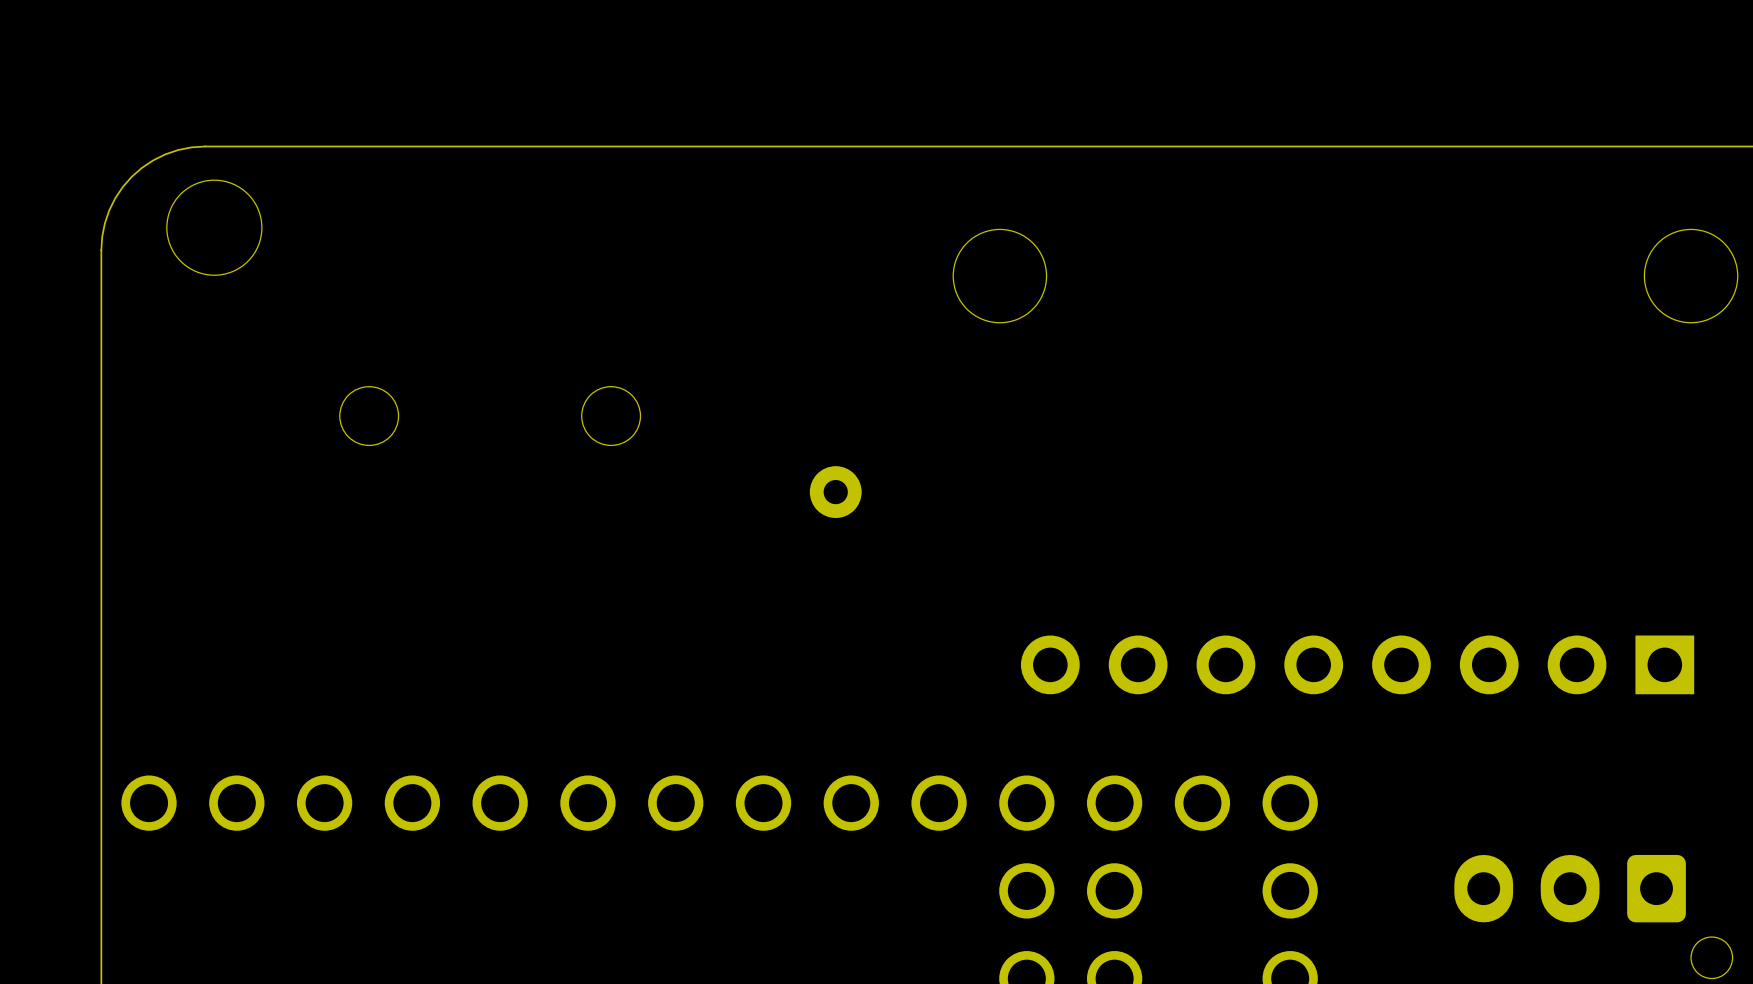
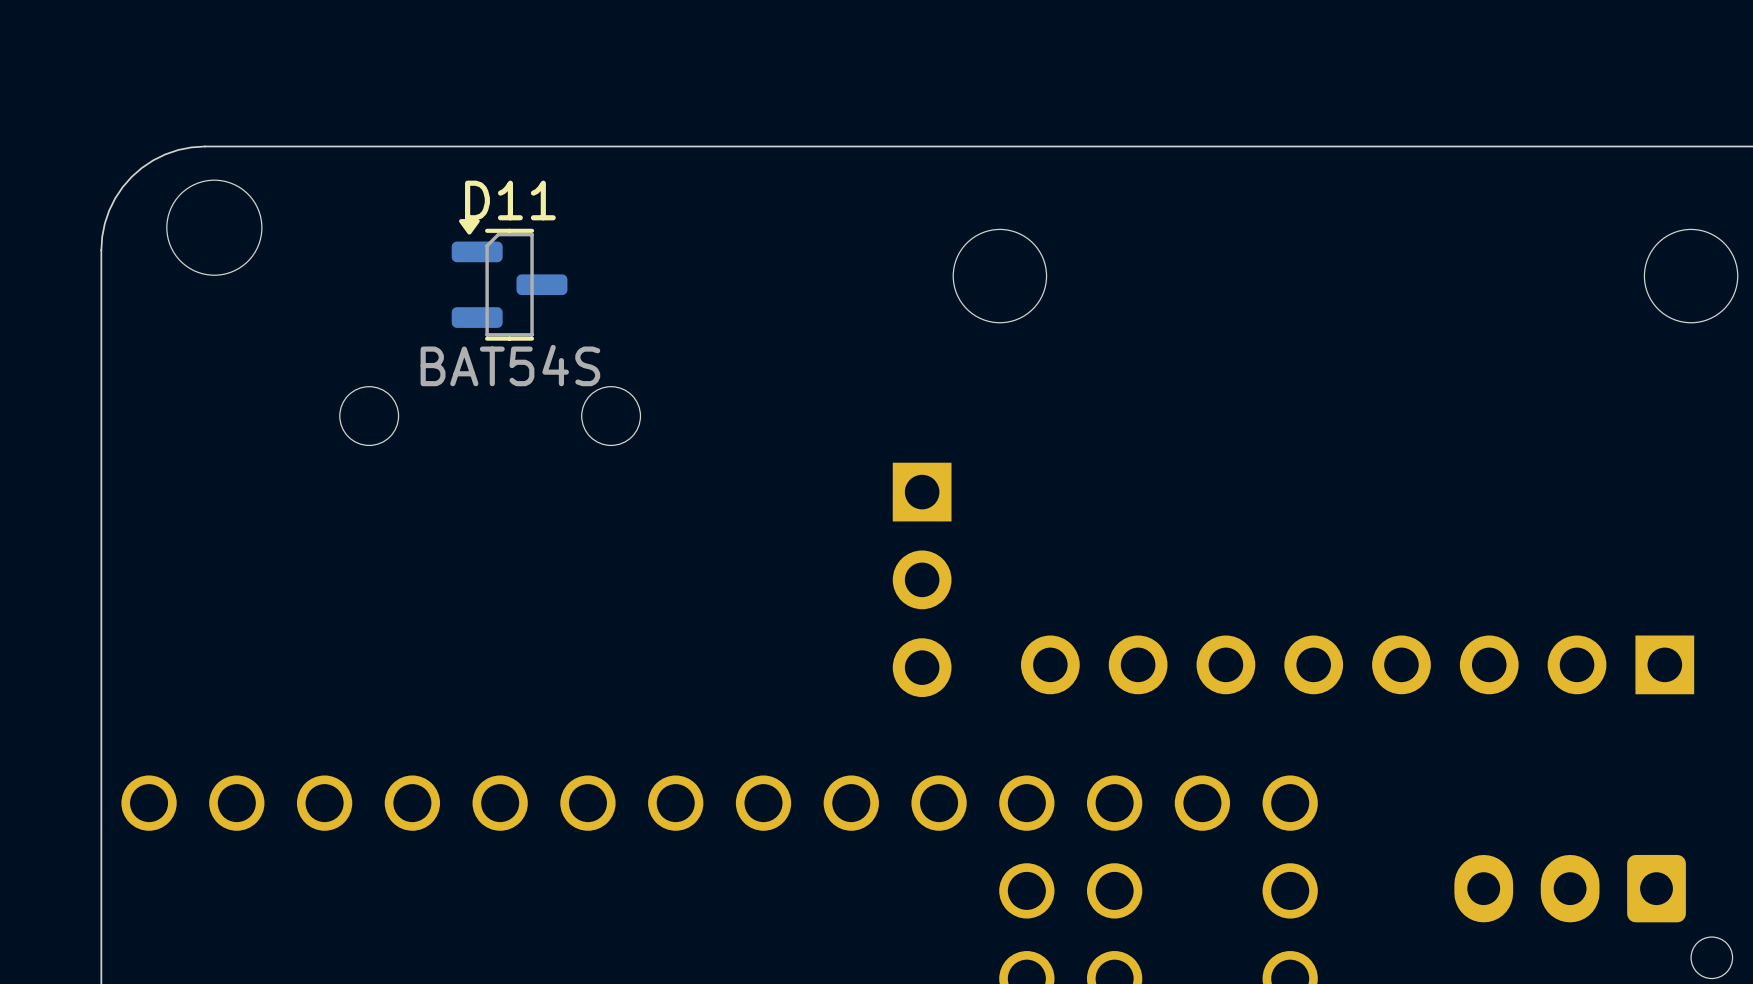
D11: none -> BAT54S (509, 279)
part: (835, 492) -> none
part: none -> (922, 579)

